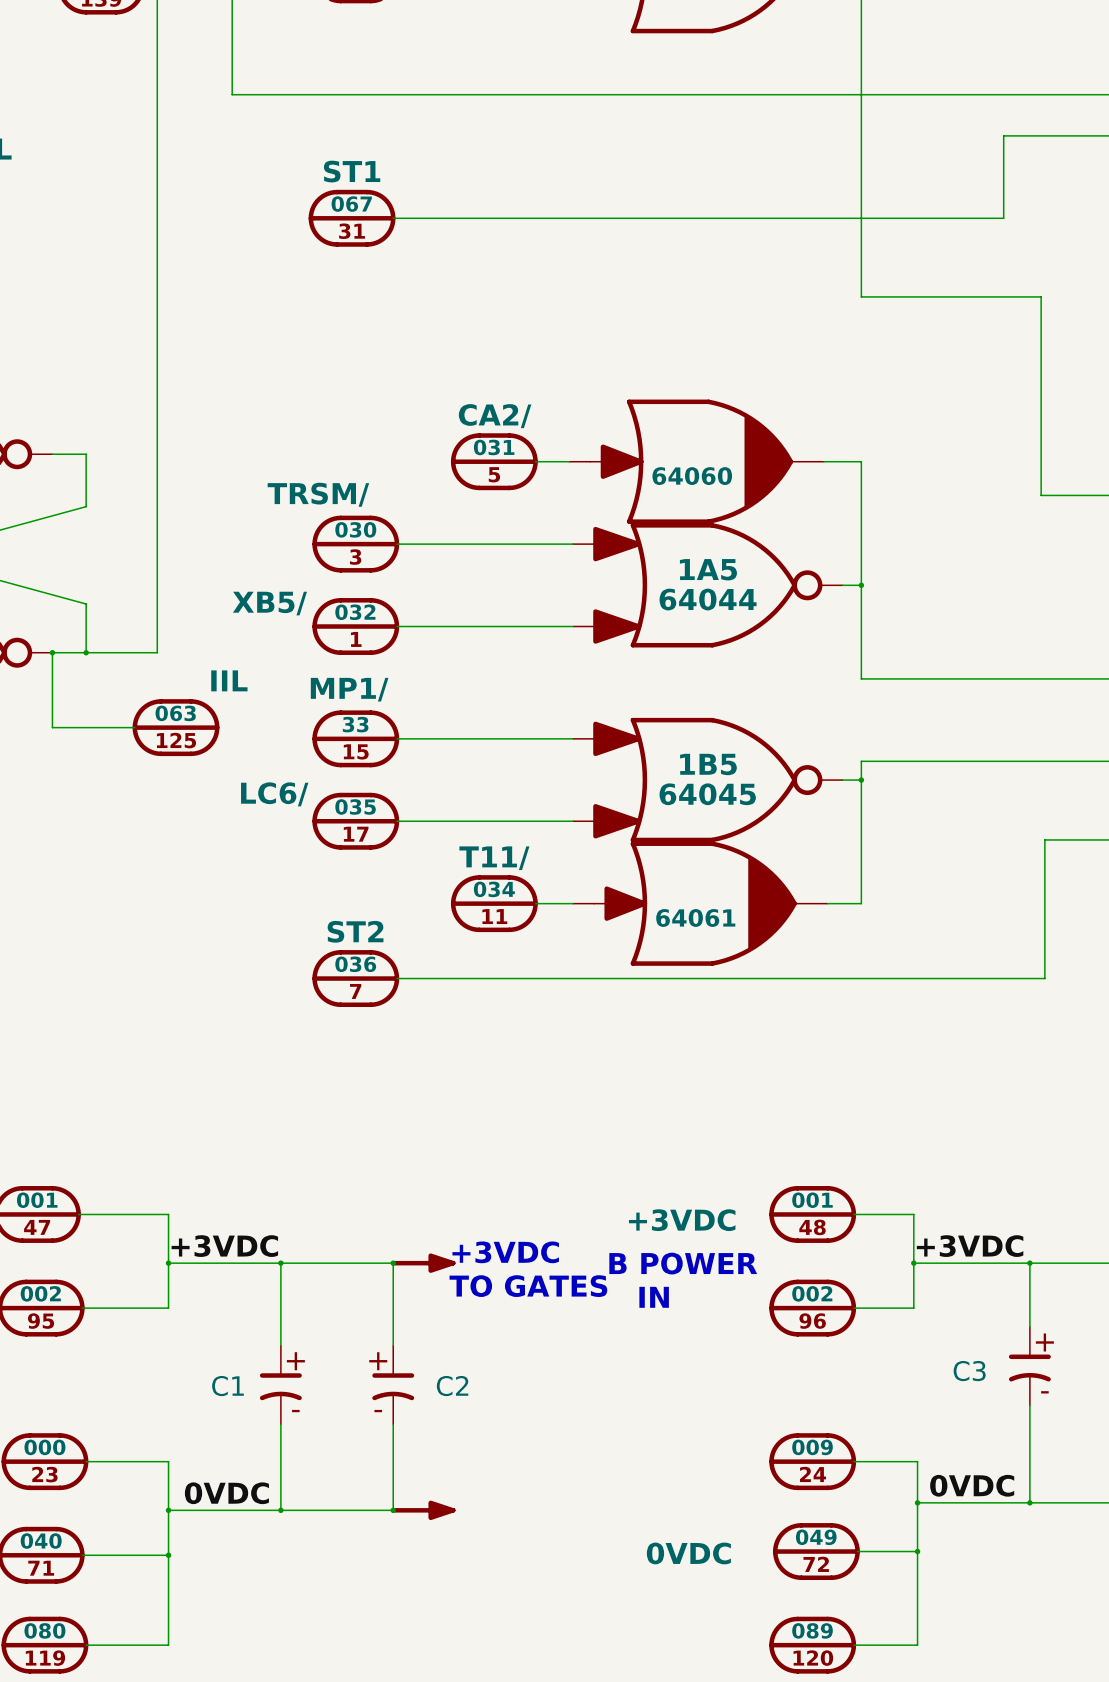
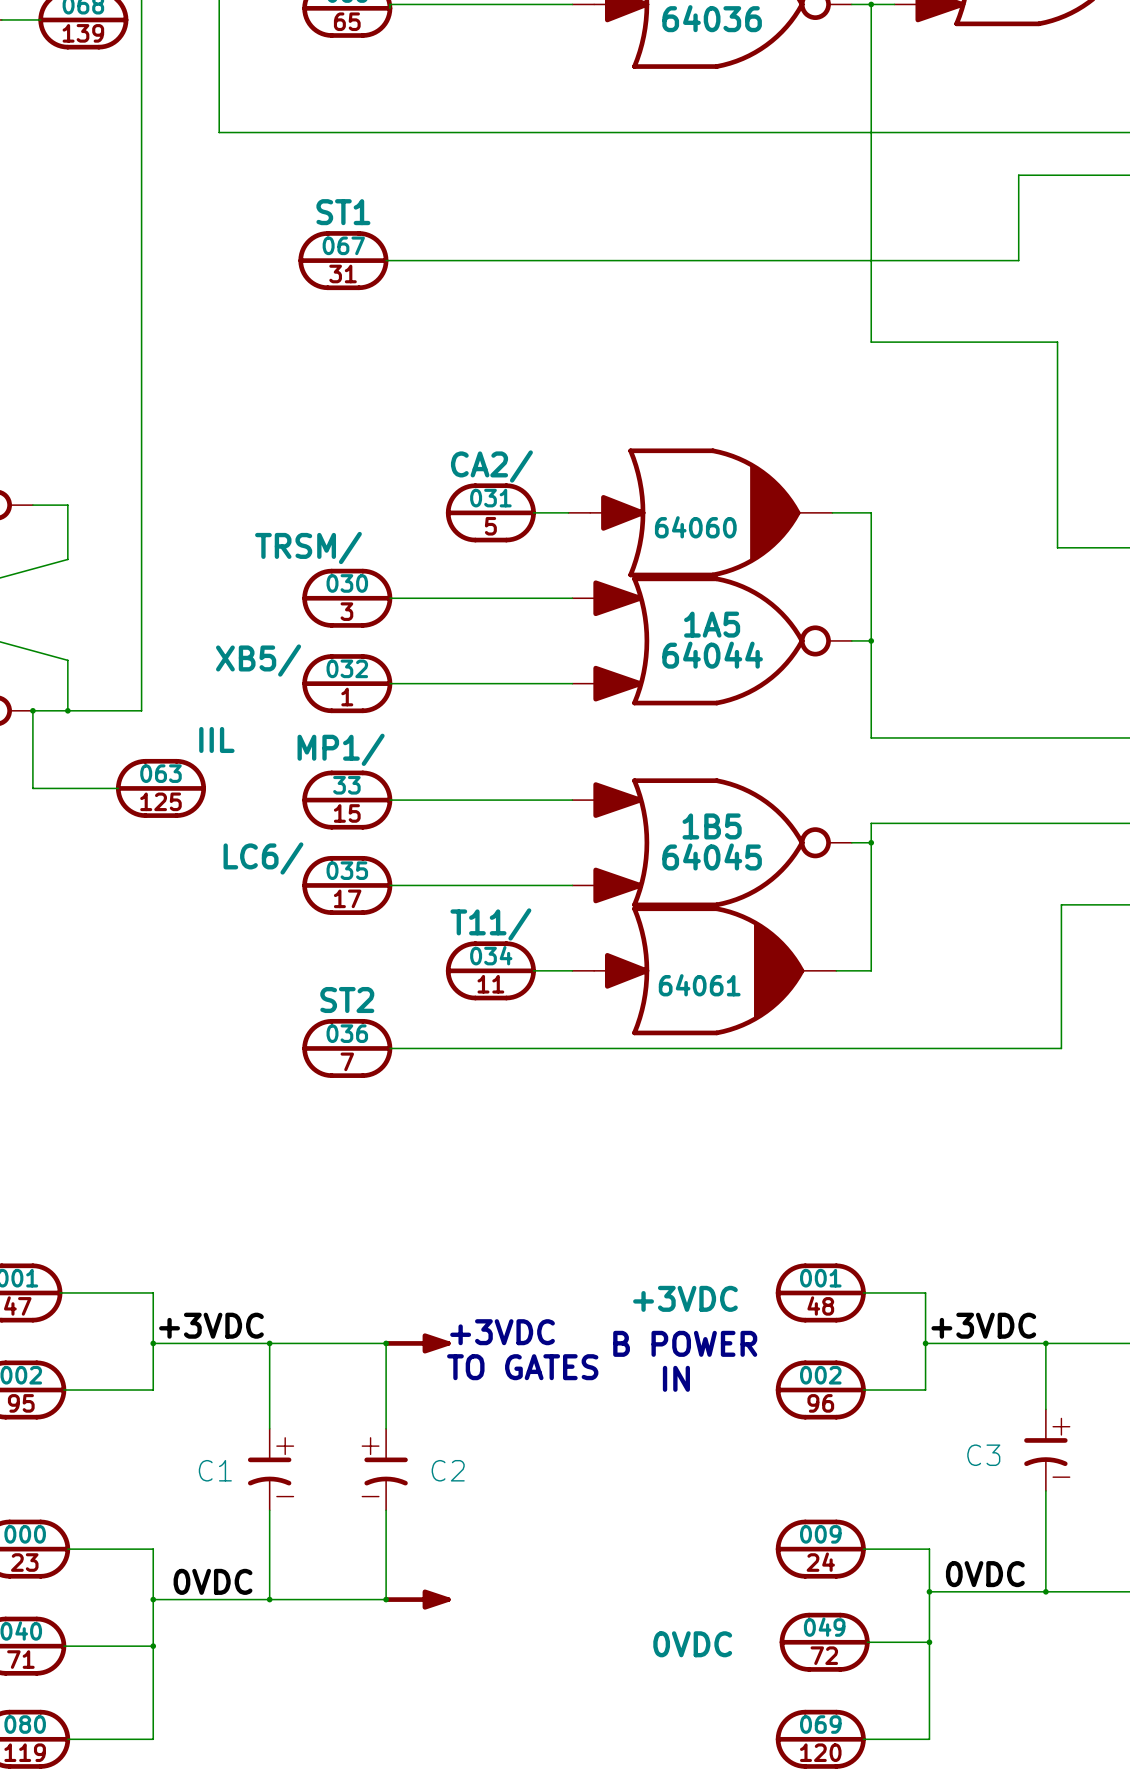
part text: 089 (812, 1630) -> 069 (820, 1724)

